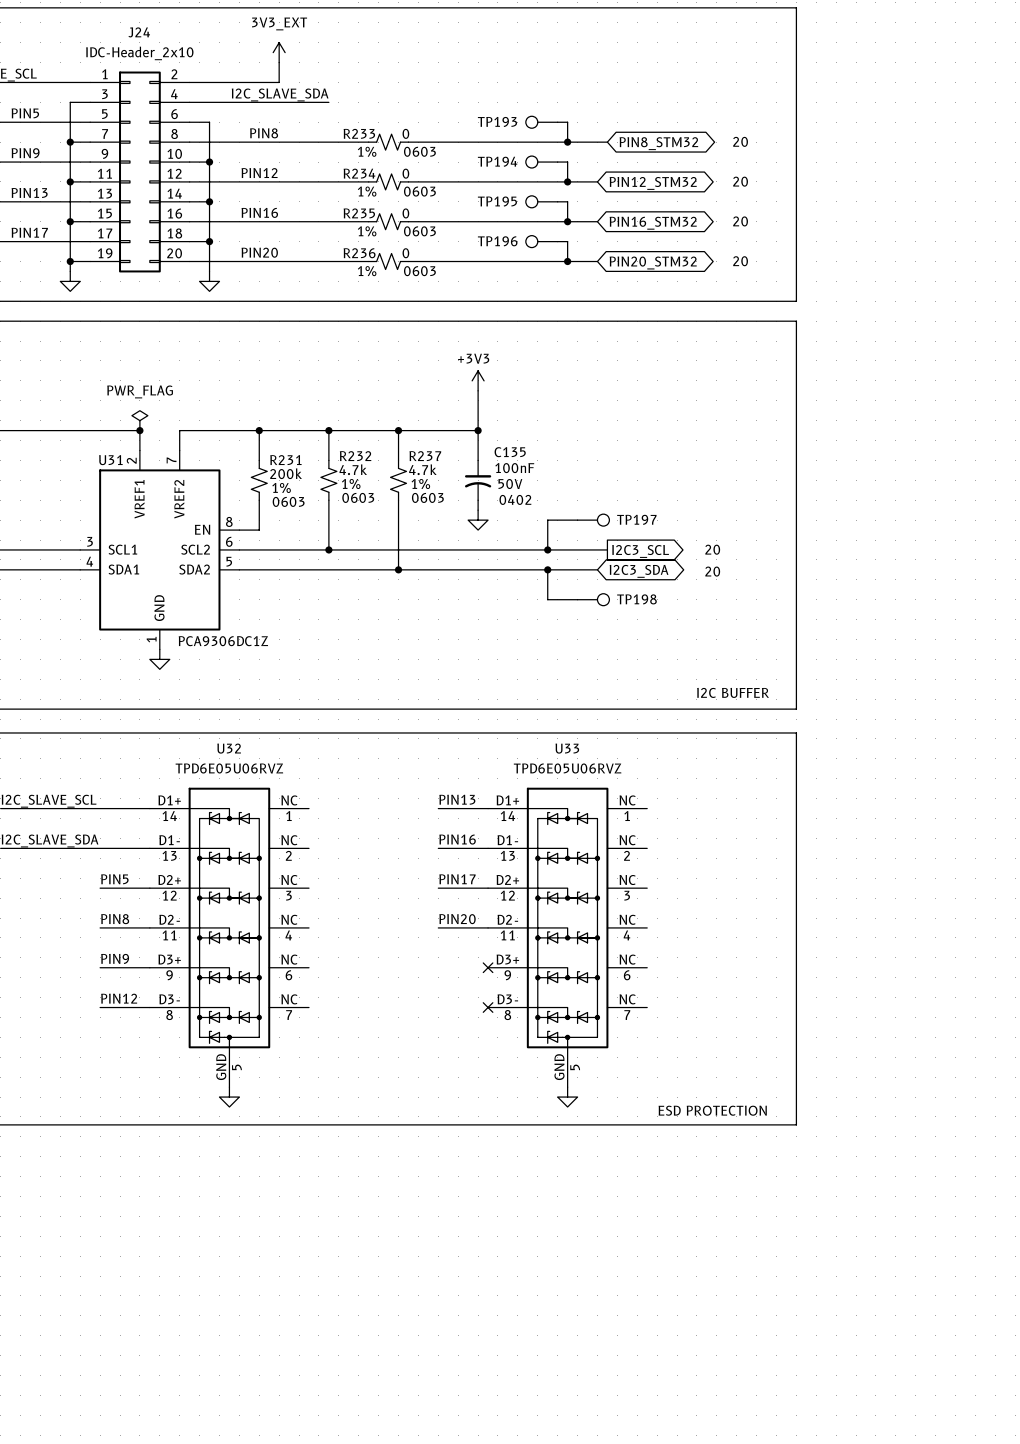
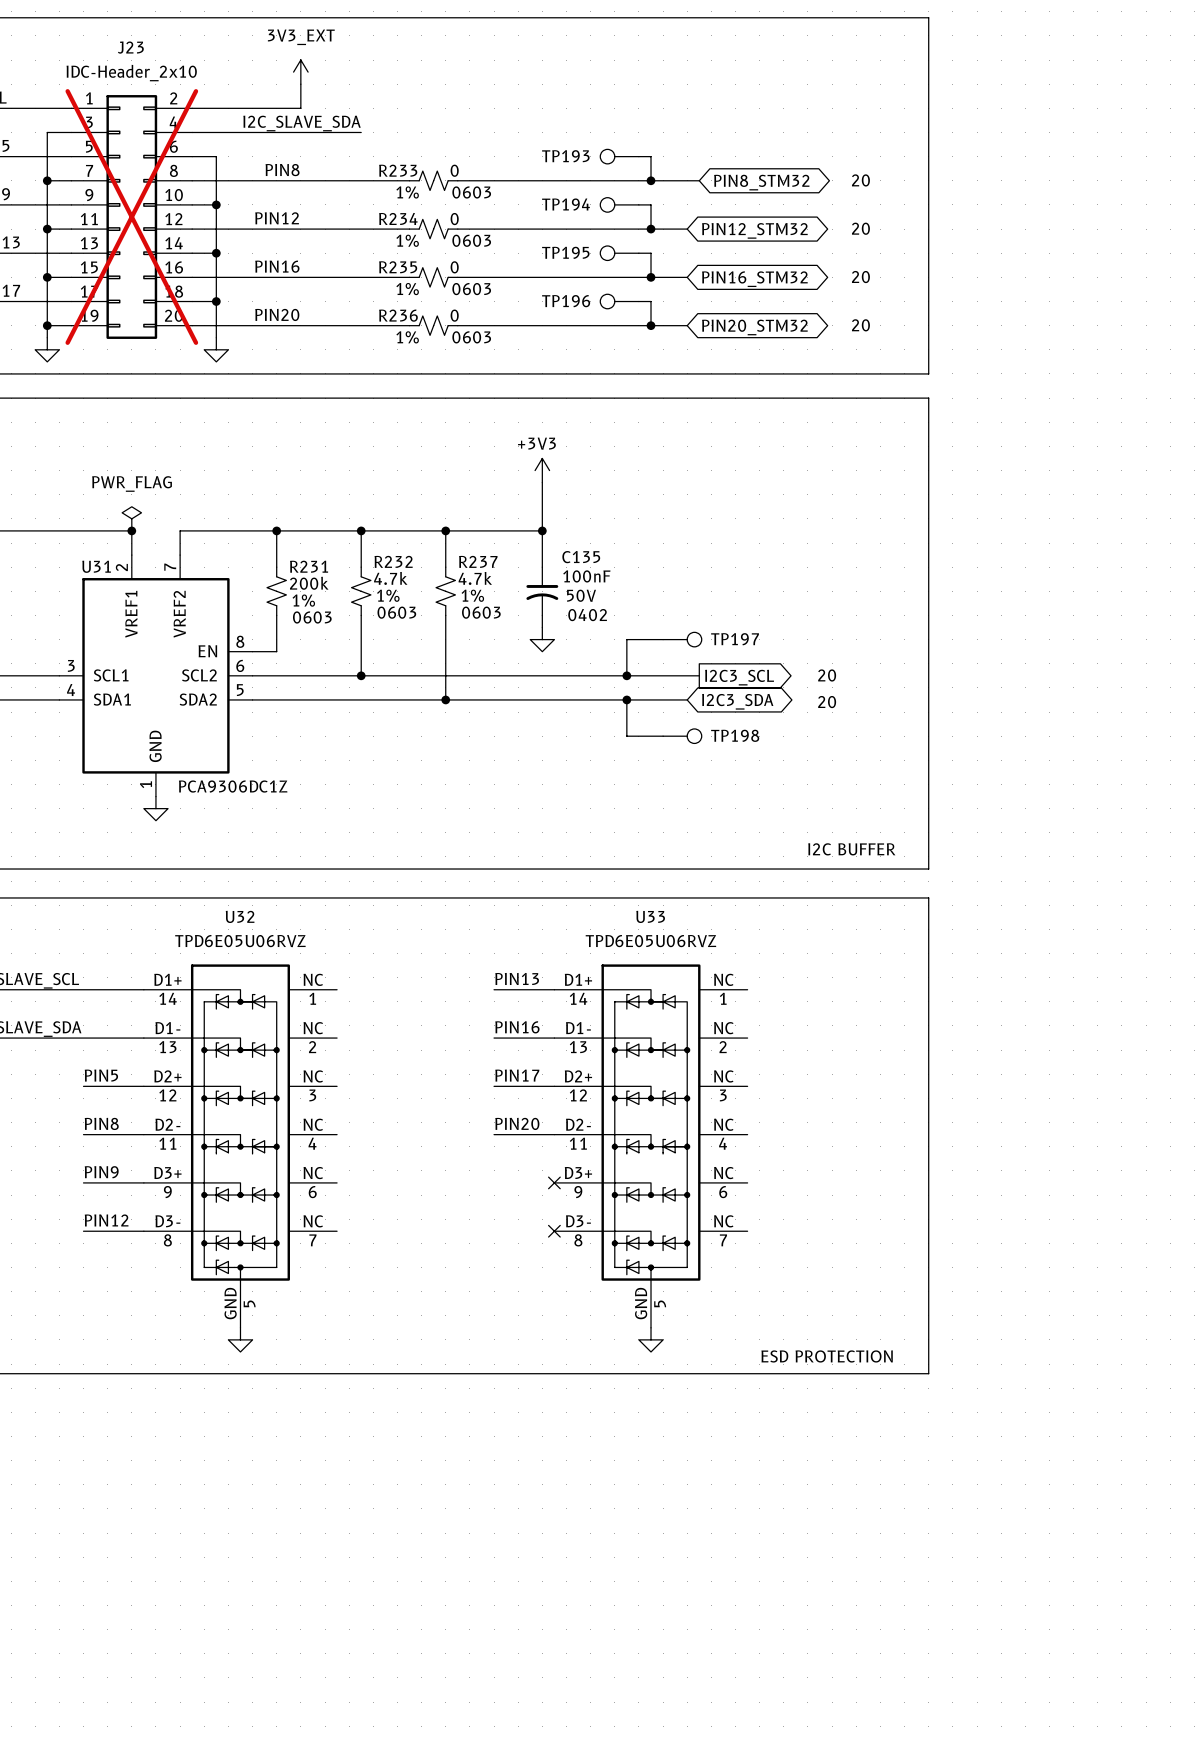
J24 name: J24 (139, 32) -> J23 (130, 47)
J24 do-not-place cross: none -> (131, 217)

